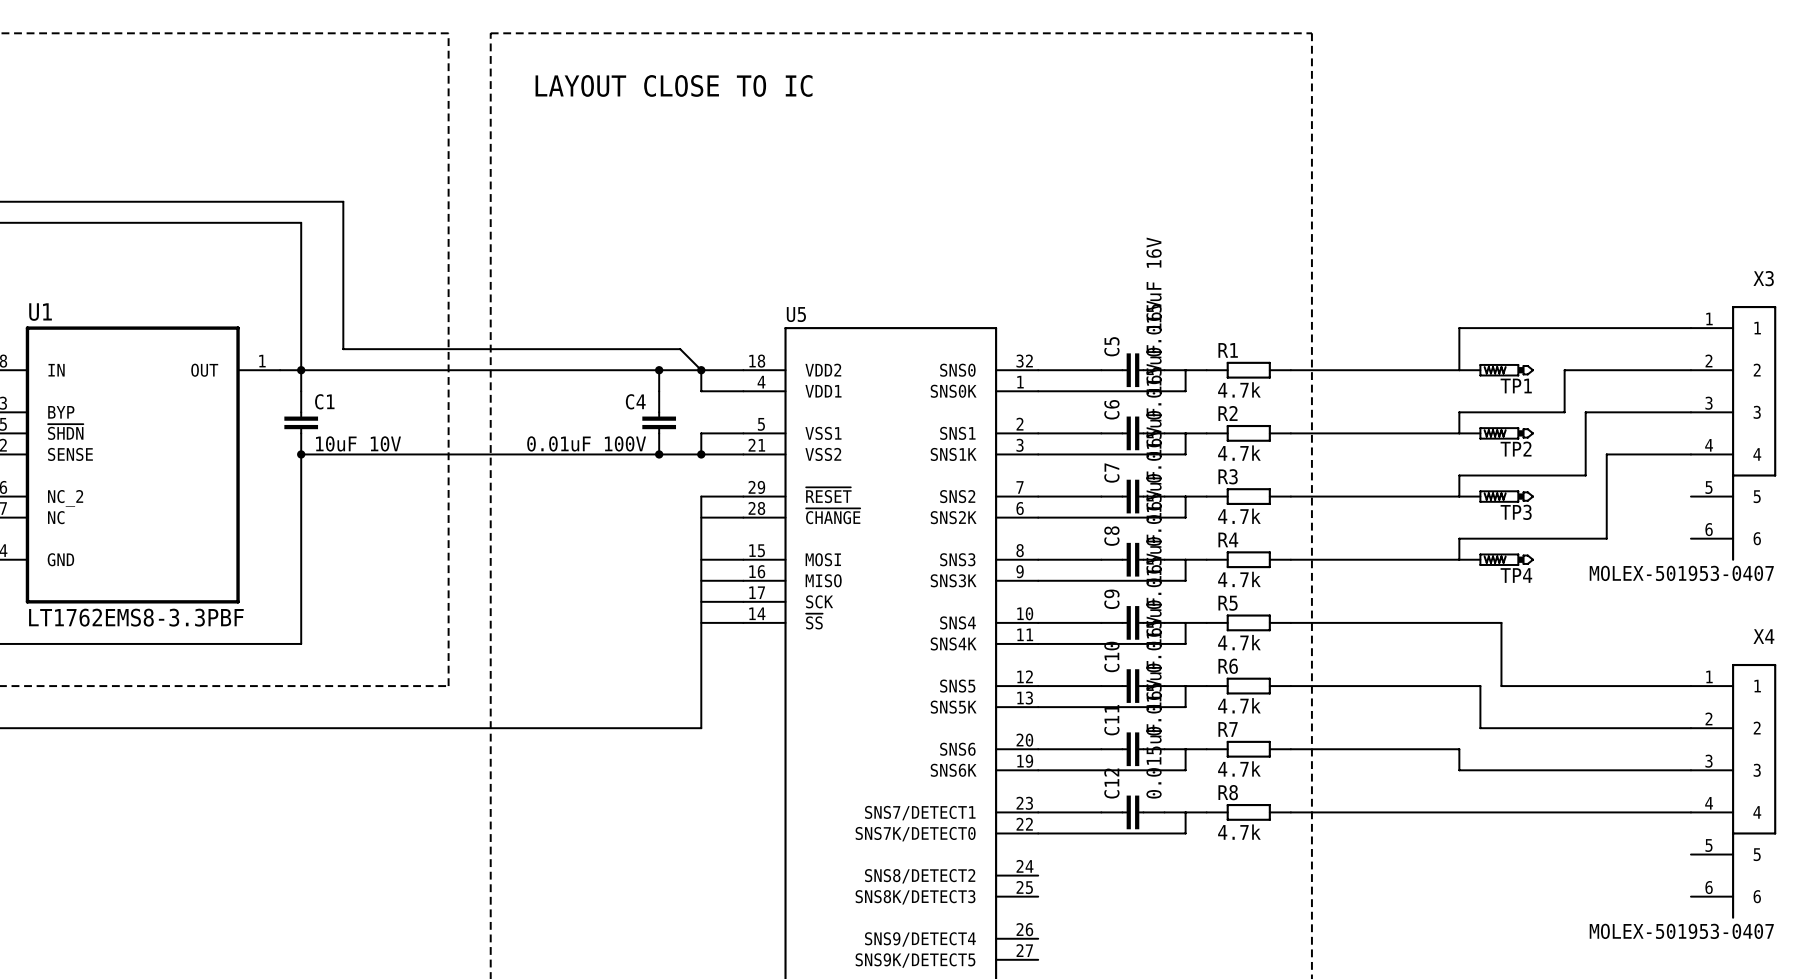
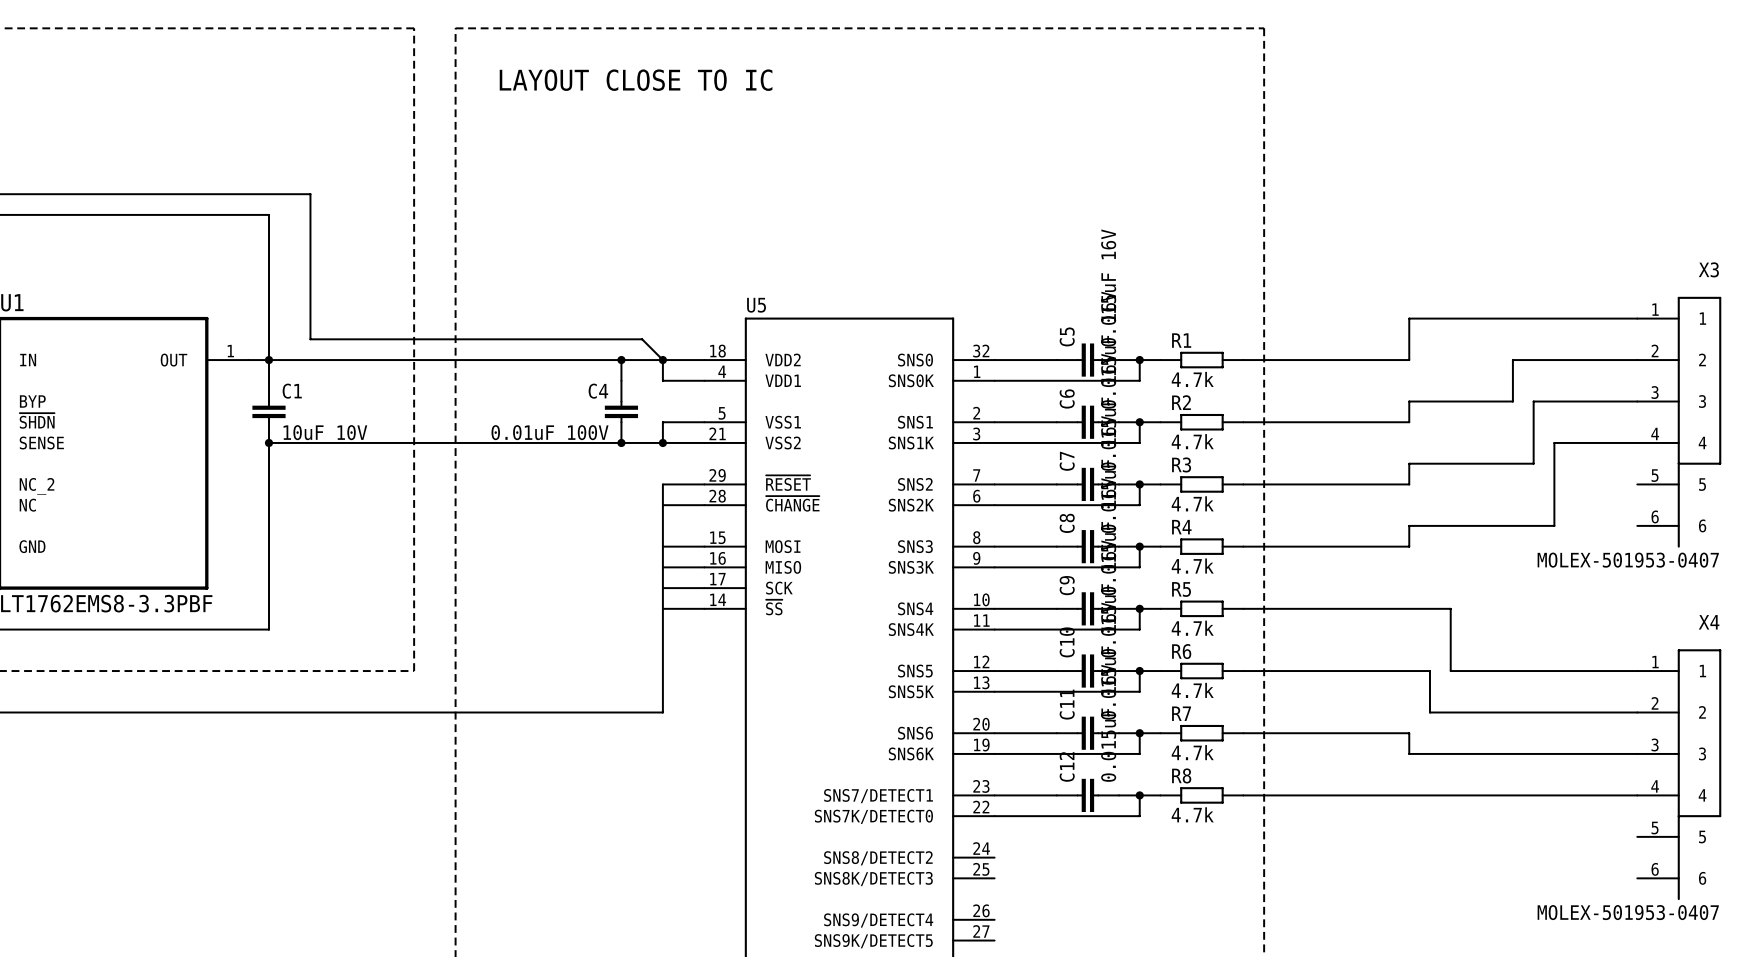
junction: none -> (1139, 360)
TP1: (1496, 370) -> none
junction: none -> (1139, 422)
TP2: (1496, 433) -> none
junction: none -> (1139, 484)
TP3: (1496, 496) -> none
junction: none -> (1139, 546)
TP4: (1496, 559) -> none
junction: none -> (1139, 608)
junction: none -> (1139, 671)
junction: none -> (1139, 733)
junction: none -> (1139, 795)

